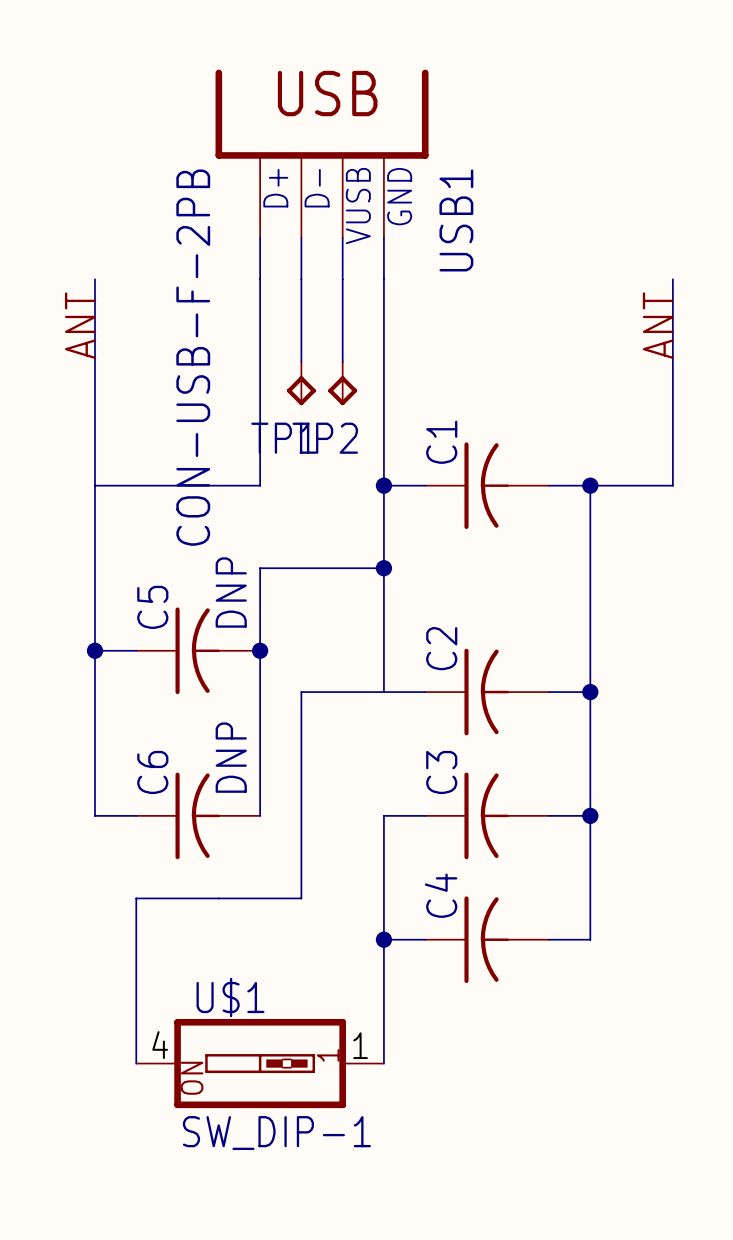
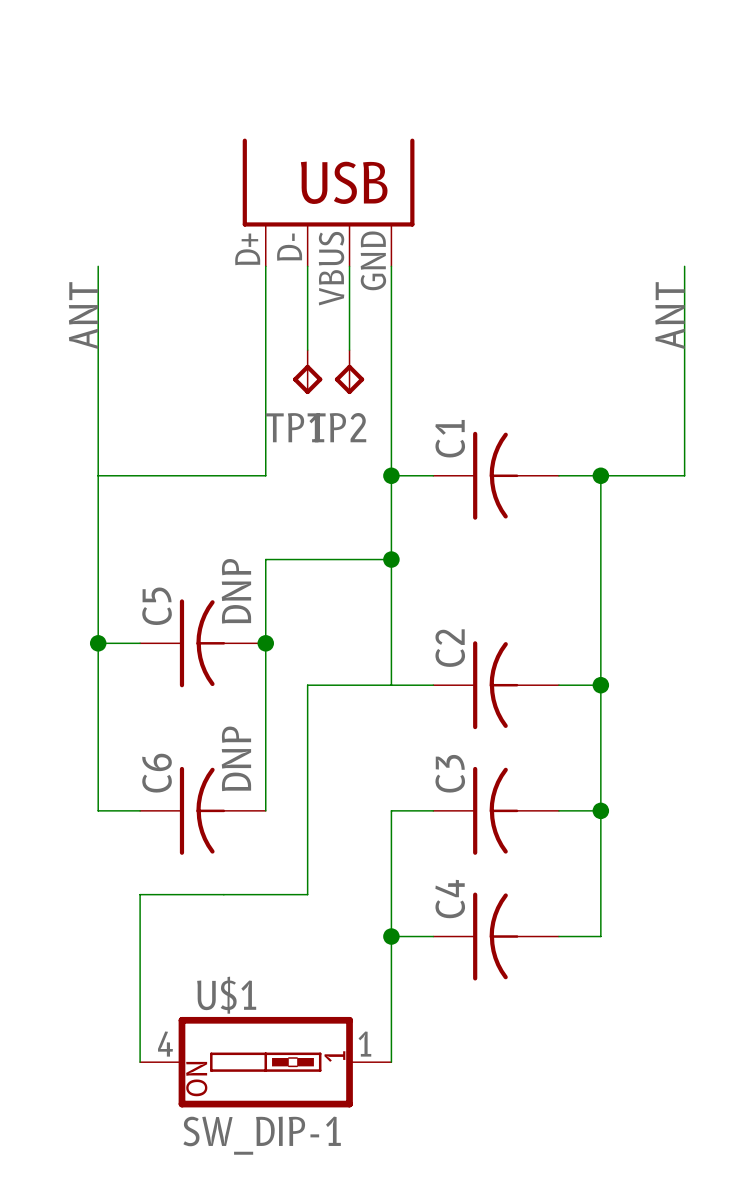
USB1: CON-USB-F-2PB (322, 153) -> none
part: none -> (328, 202)

